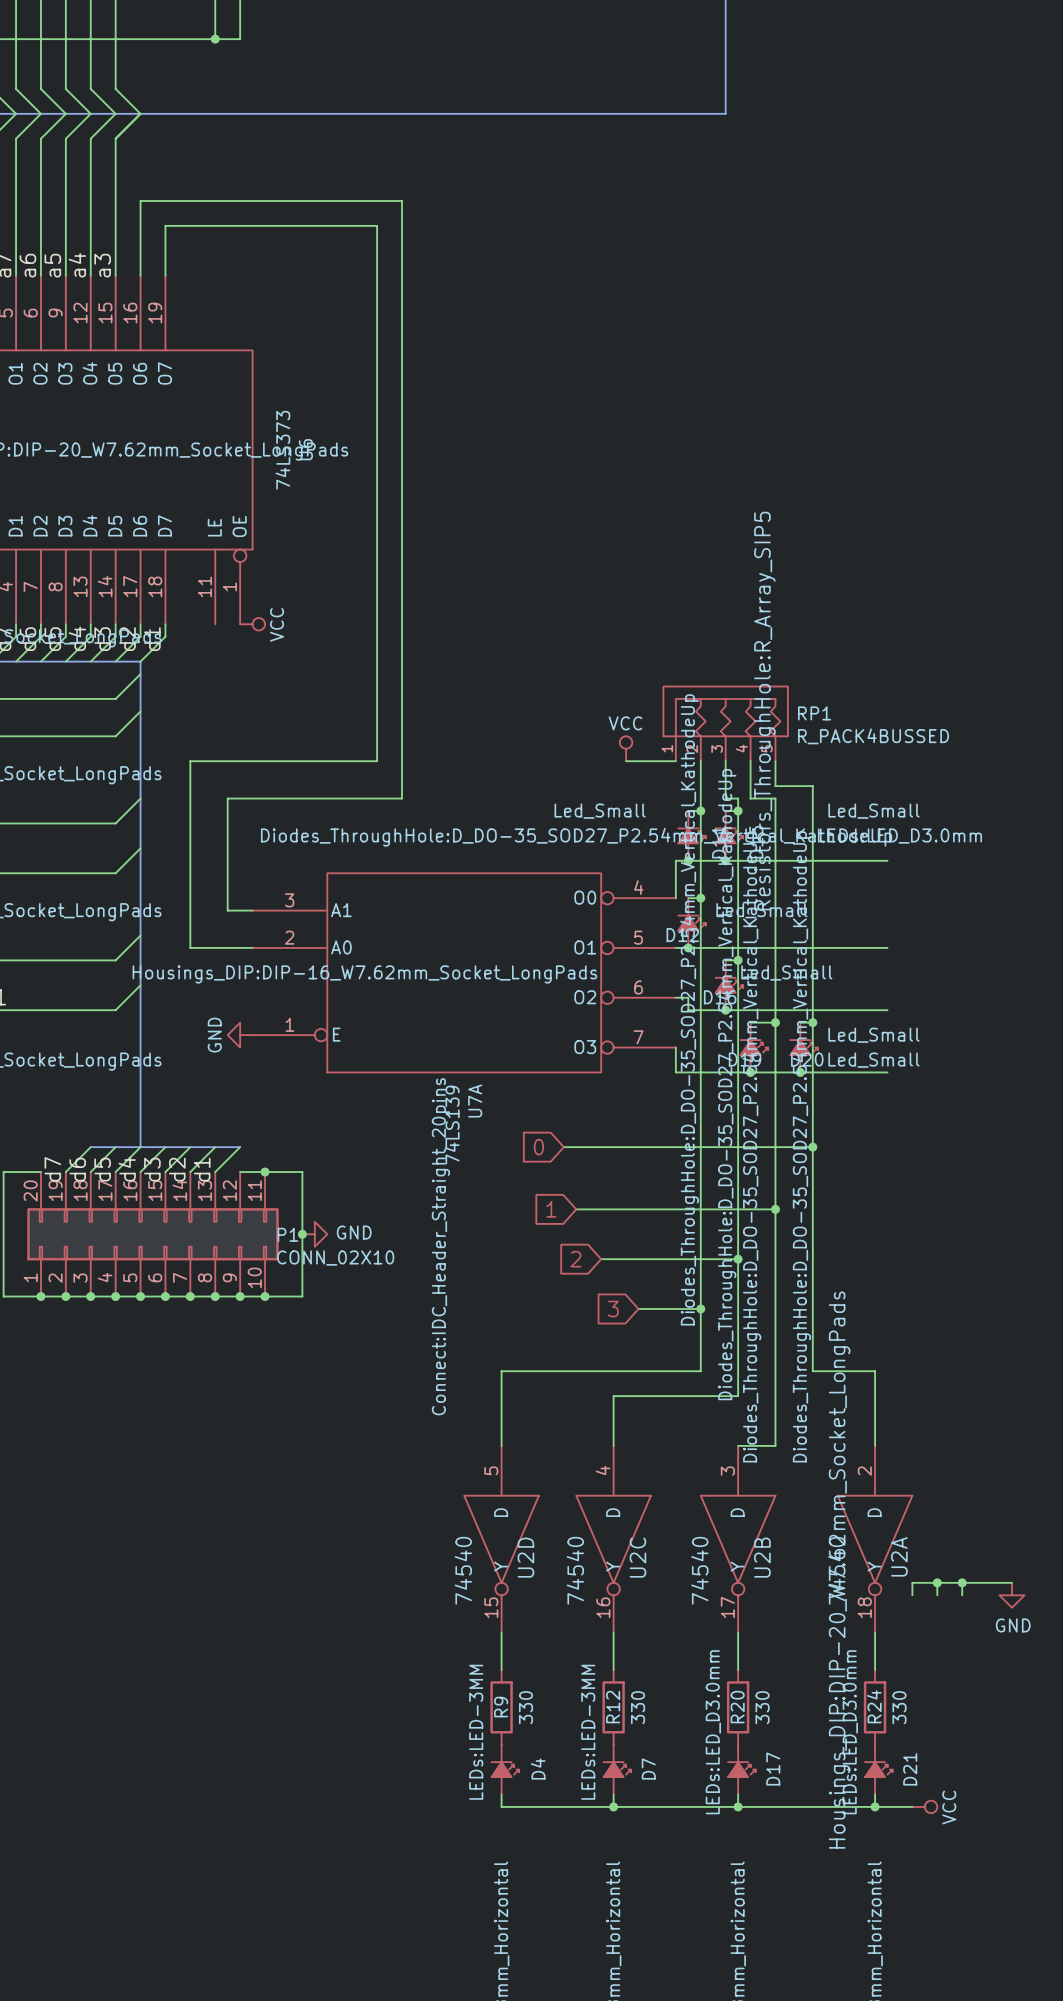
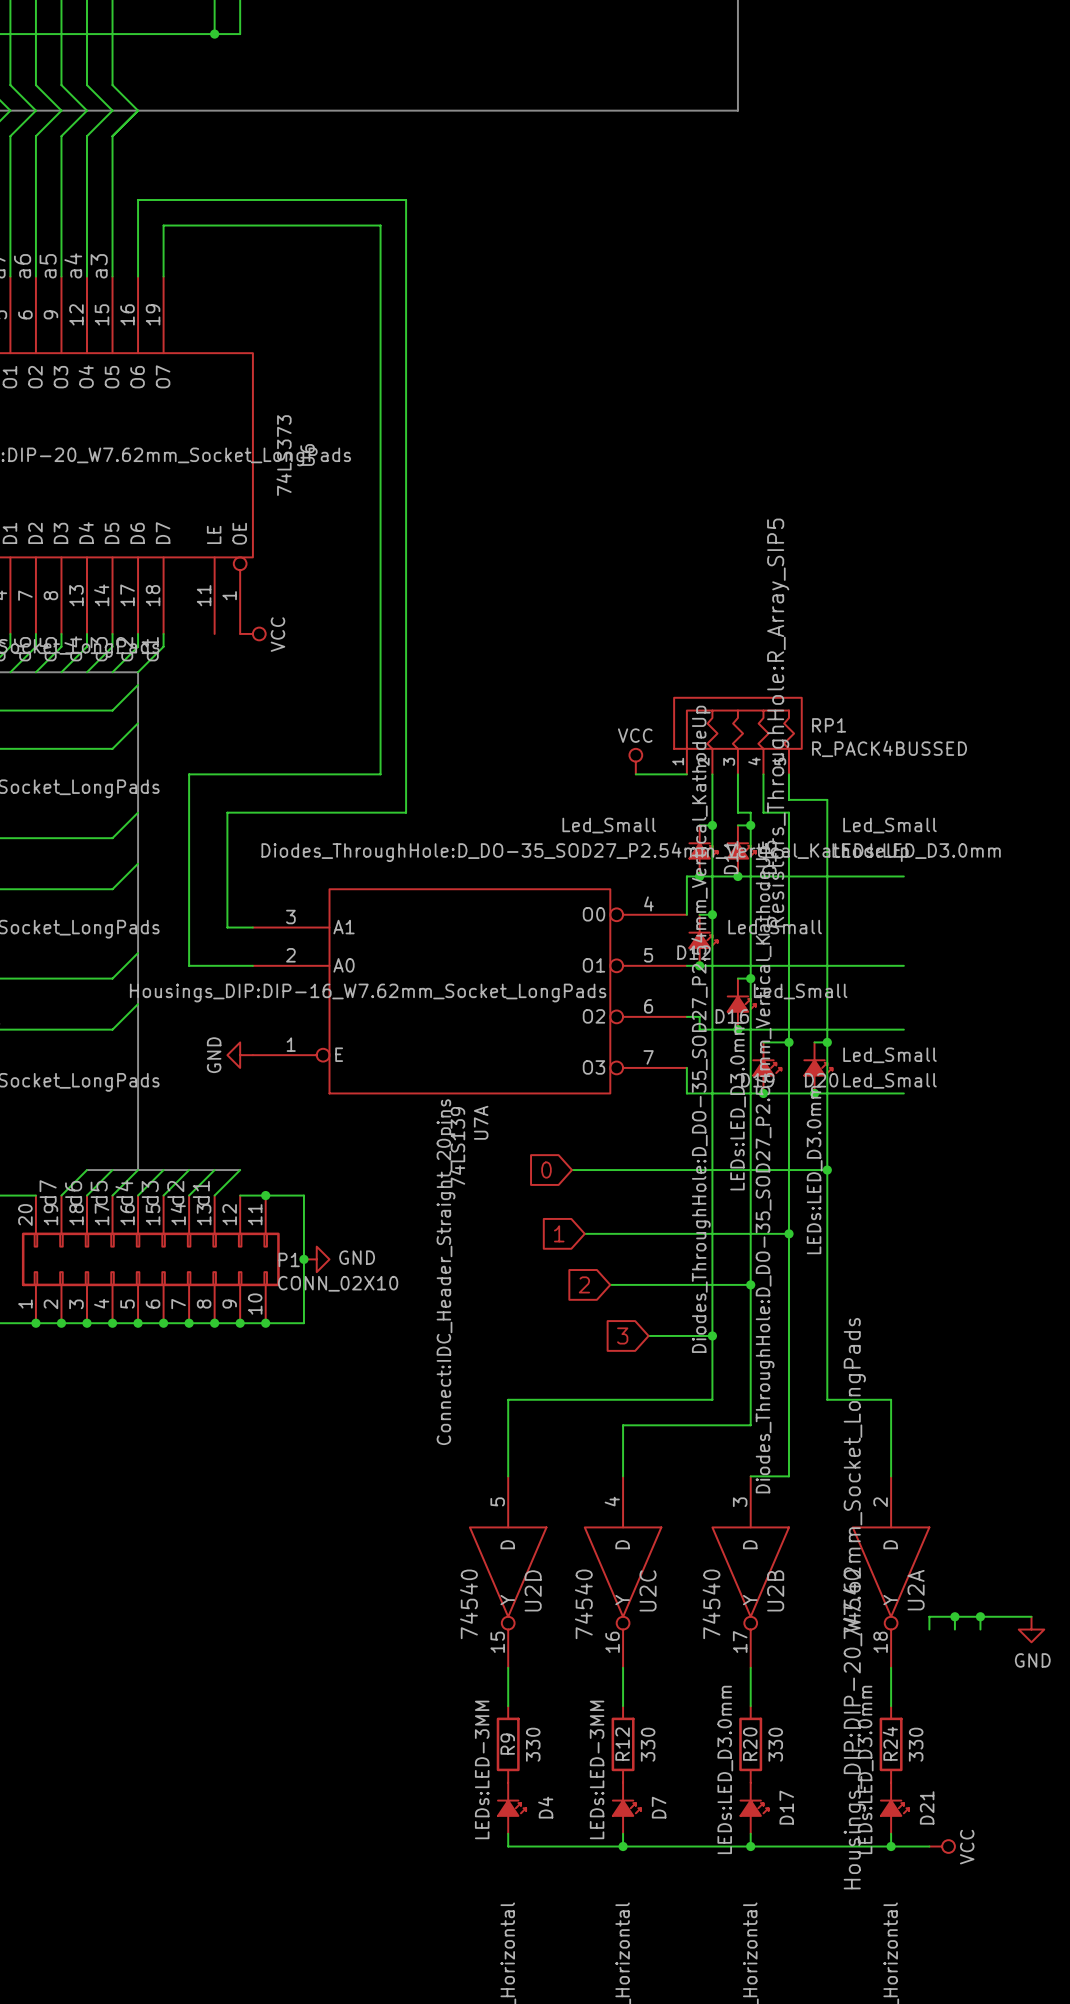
D16 text: Diodes_ThroughHole:D_DO-35_SOD27_P2.54mm_Vertical_KathodeUp (726, 1084) -> LEDs:LED_D3.0mm (738, 1106)
D20 text: Diodes_ThroughHole:D_DO-35_SOD27_P2.54mm_Vertical_KathodeUp (801, 1146) -> LEDs:LED_D3.0mm (814, 1170)

